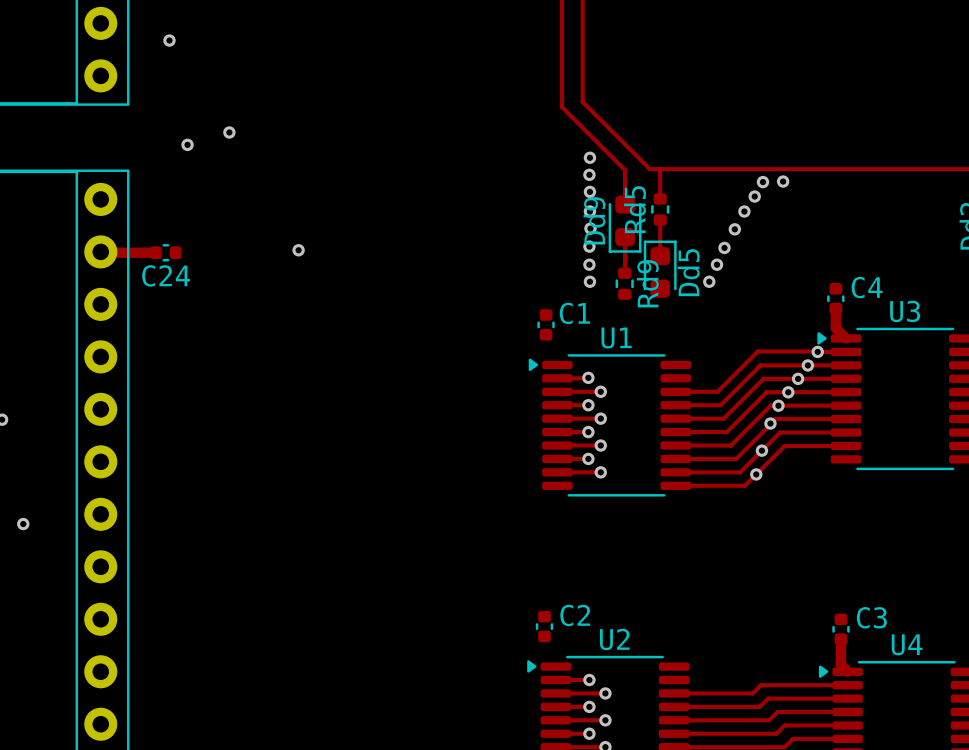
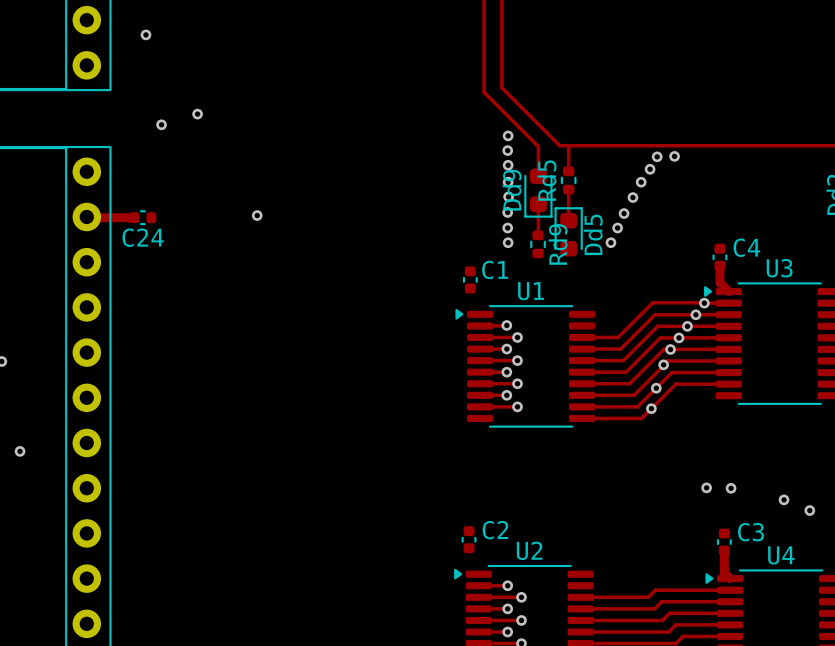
via: none -> (706, 487)
via: none -> (731, 488)
via: none -> (784, 499)
via: none -> (809, 510)

